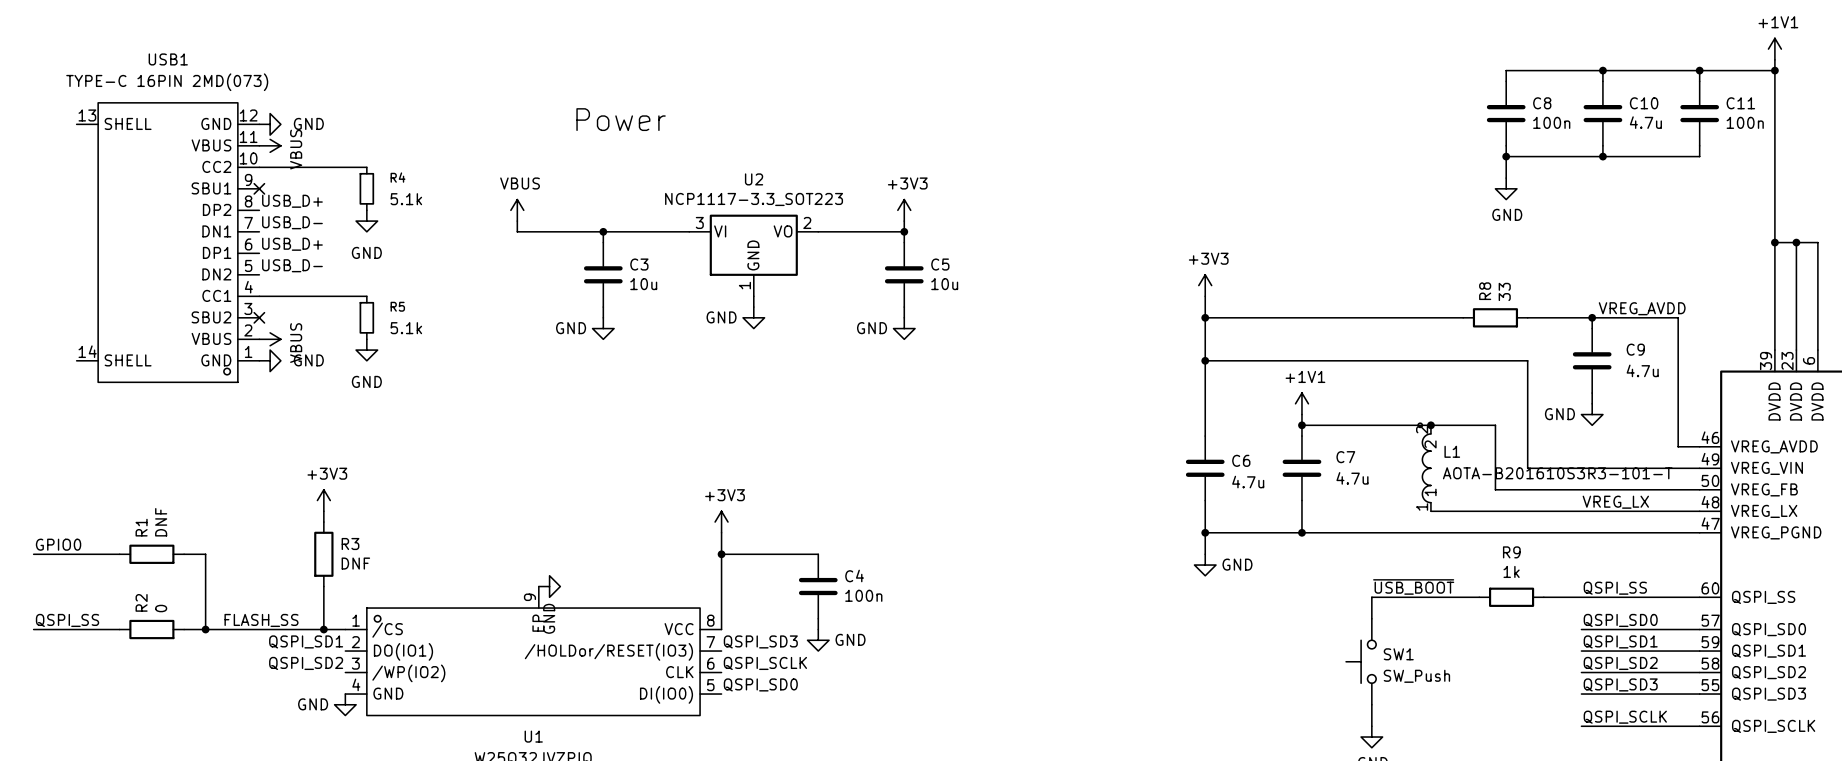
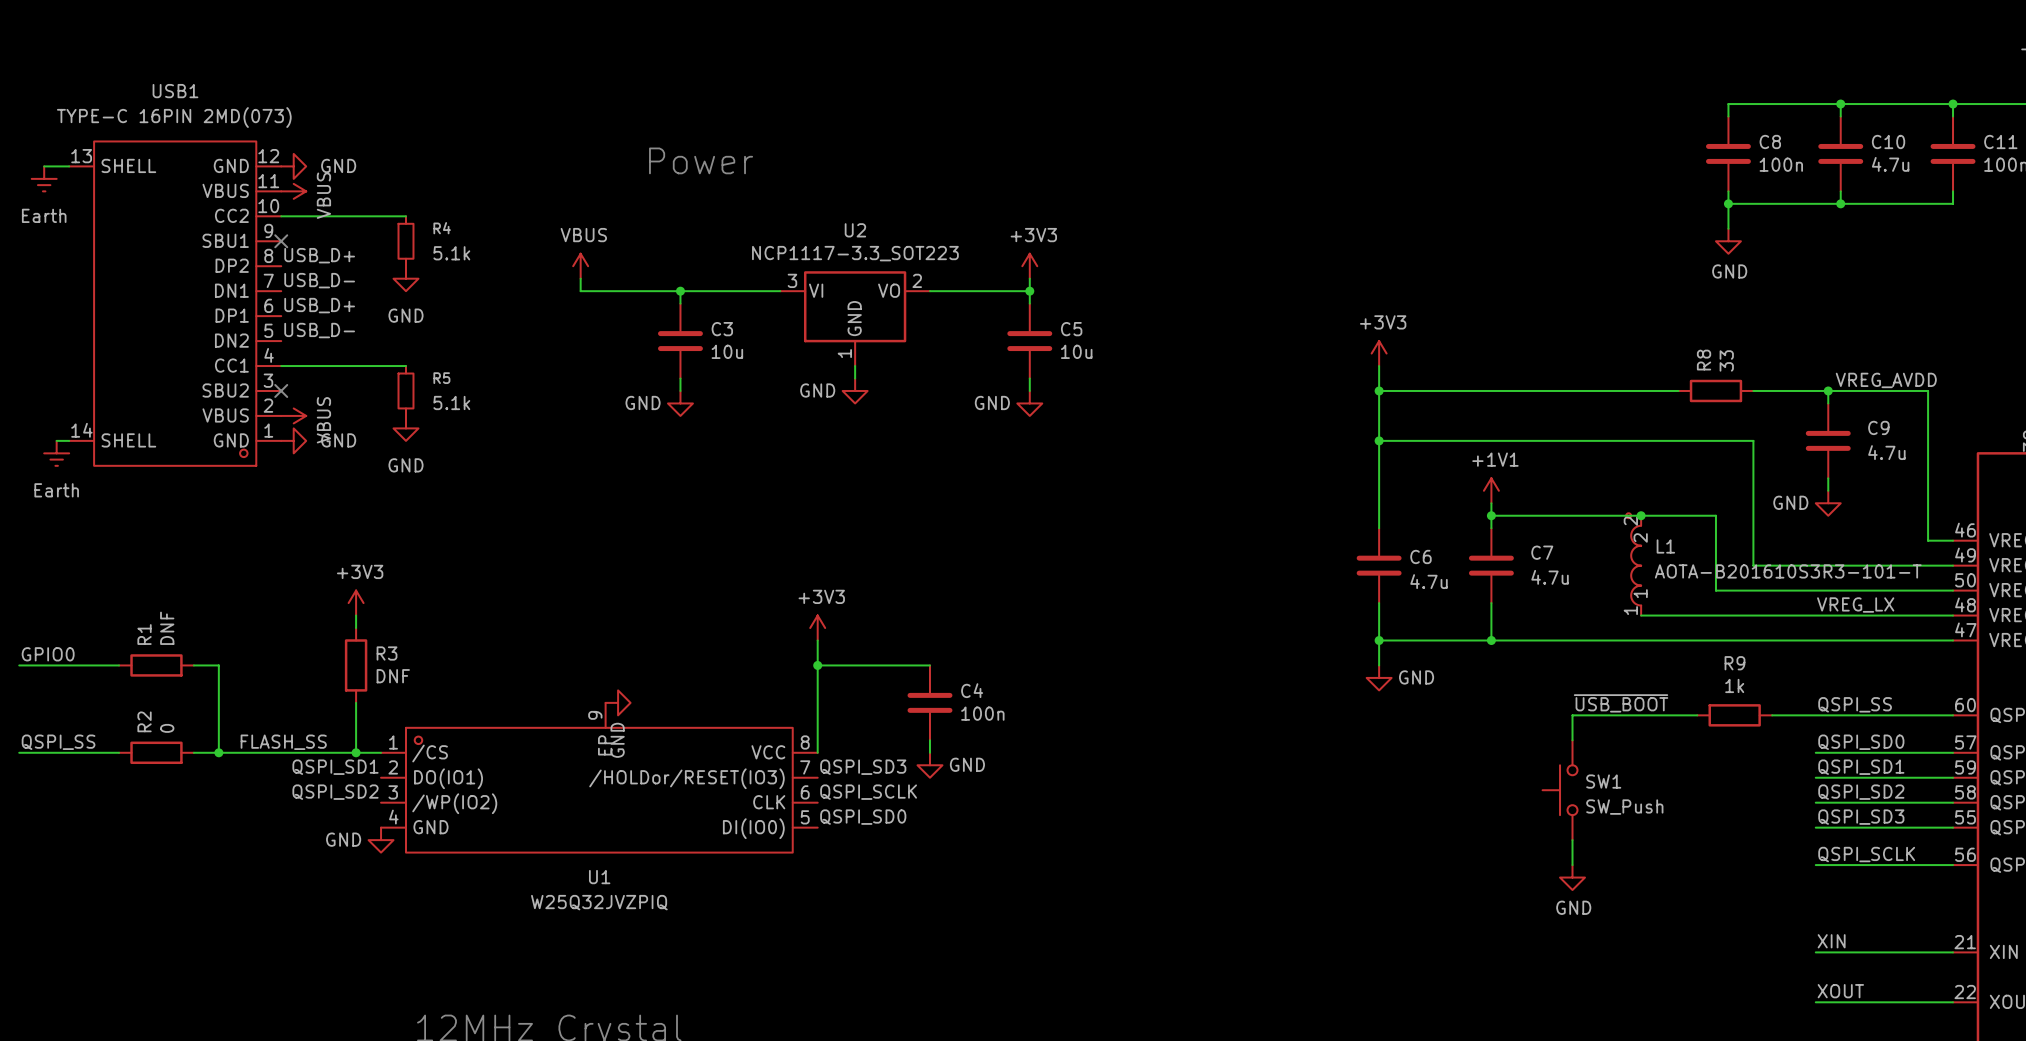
wire: none -> (44, 166) (69, 166)
power symbol: none -> Earth (44, 178)
wire: none -> (56, 440) (69, 440)
power symbol: none -> Earth (56, 453)

